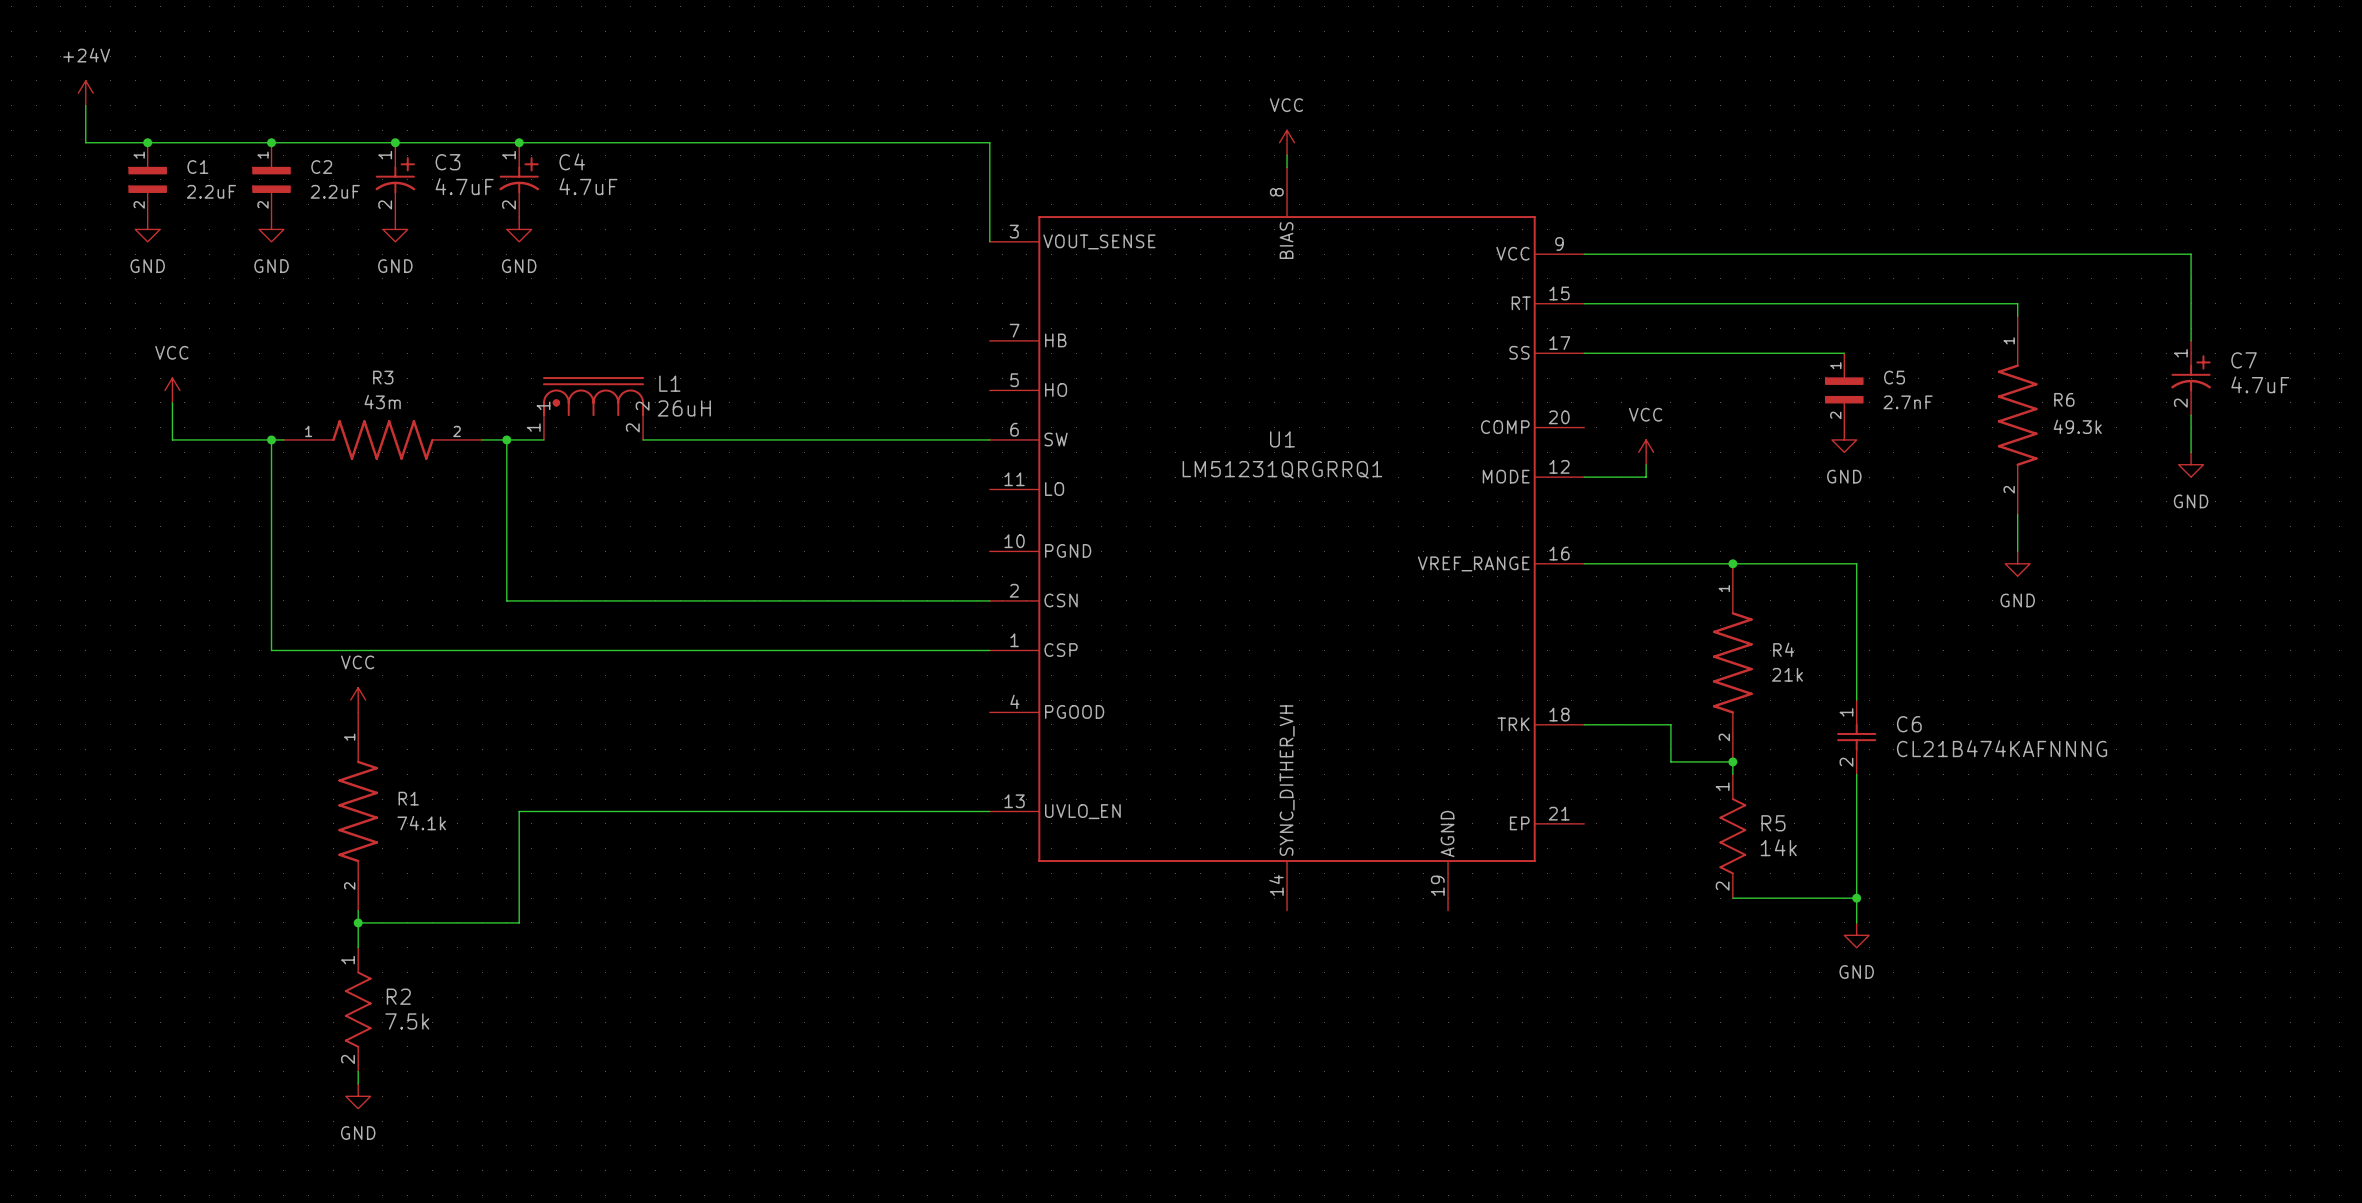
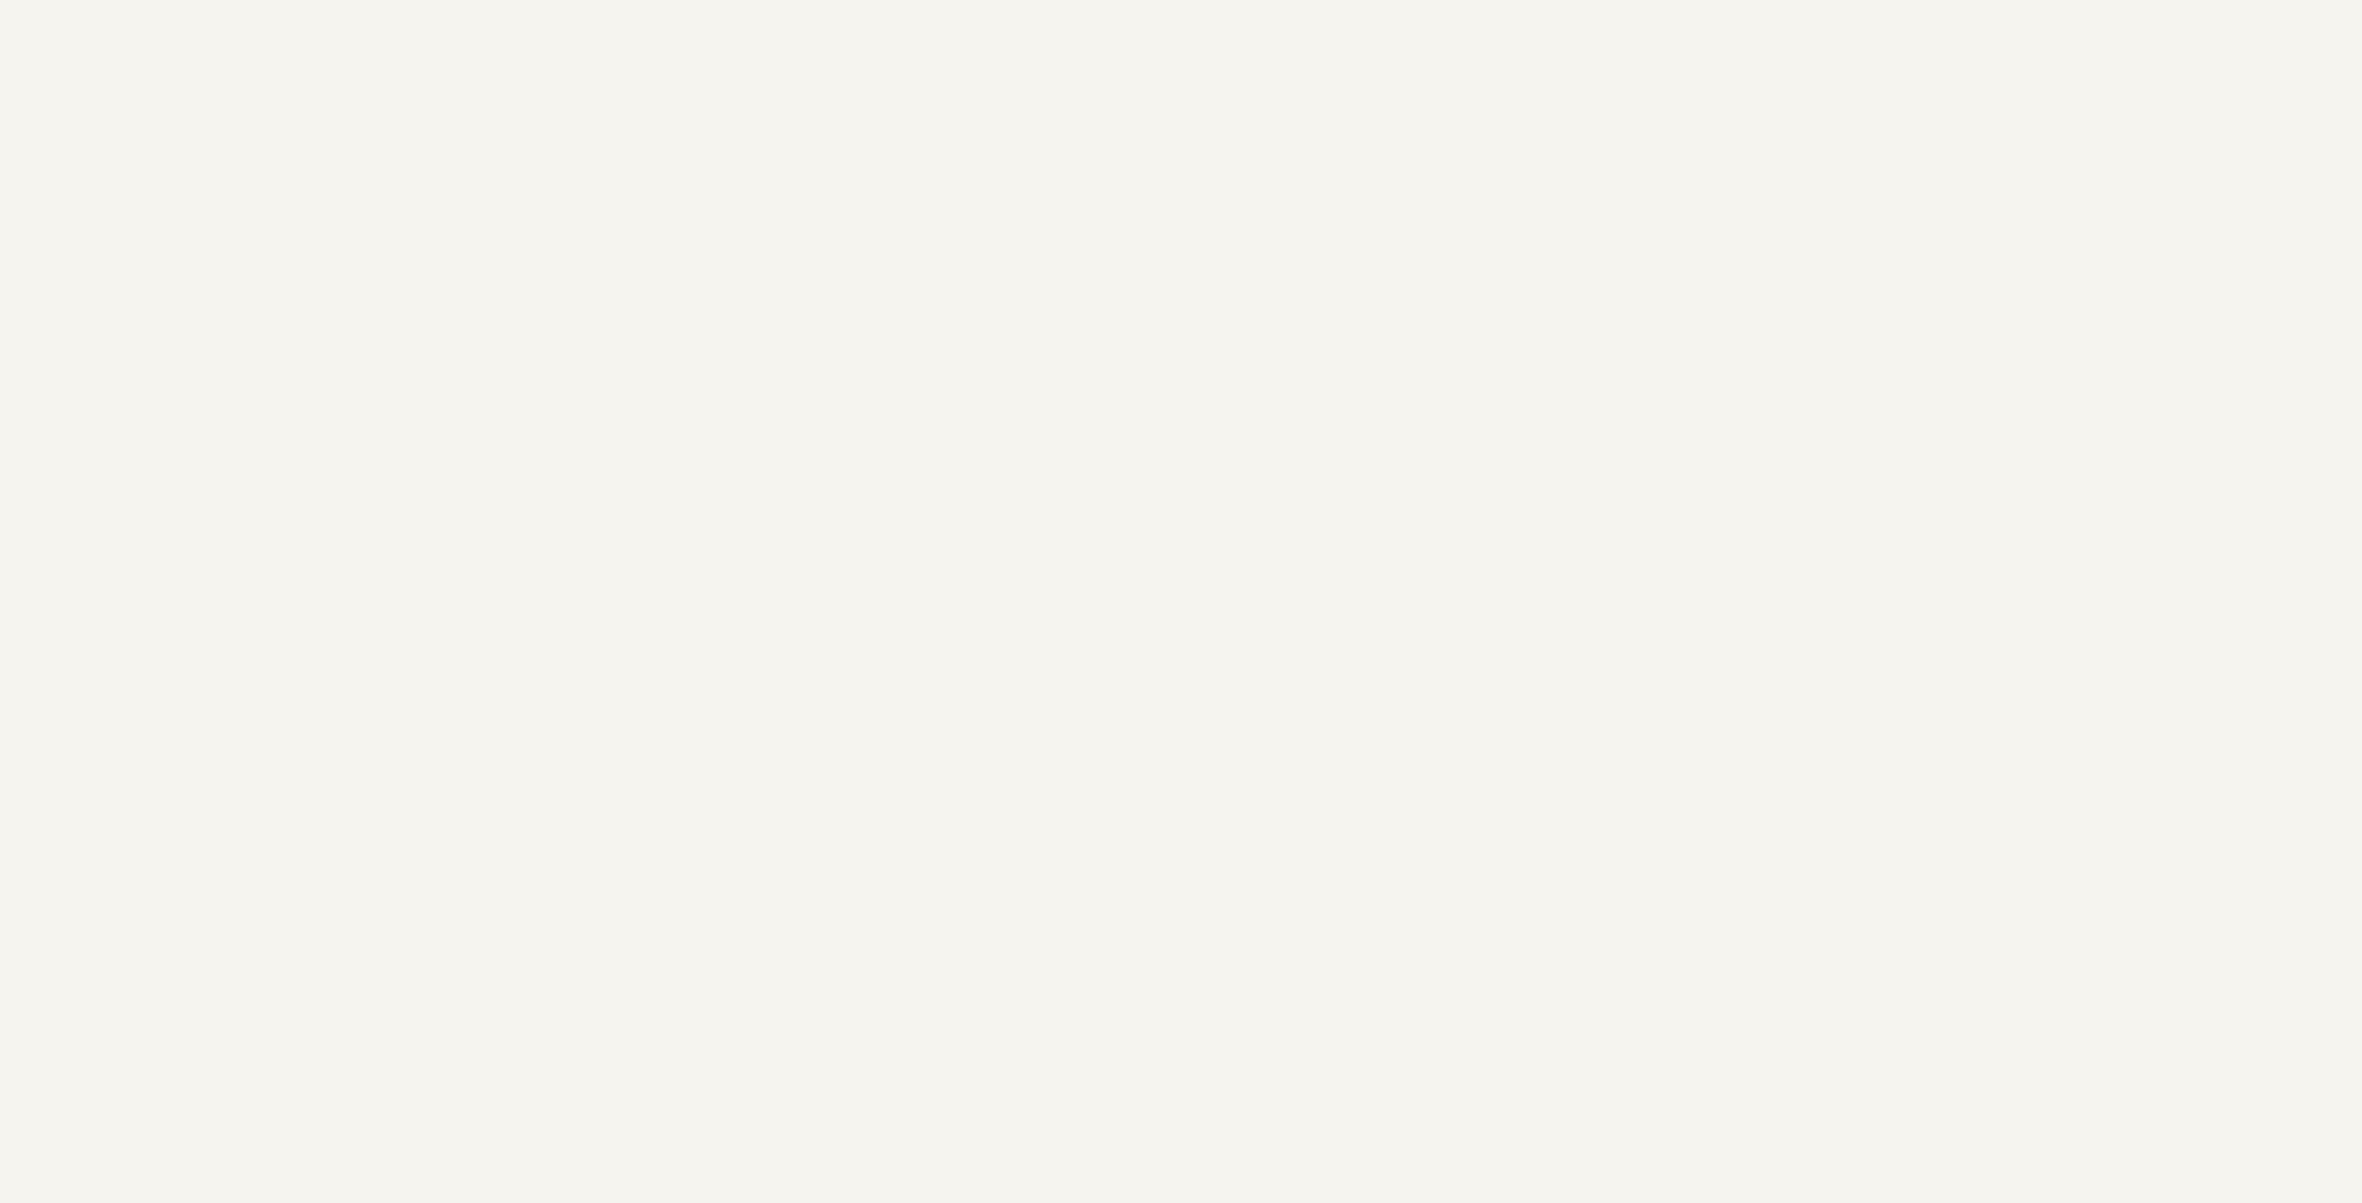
power symbol: +24V (85, 93) -> none
wire: (85, 105) (85, 142) (989, 142) (989, 241) -> none
junction: (147, 142) -> none
junction: (271, 142) -> none
junction: (395, 142) -> none
junction: (519, 142) -> none
power symbol: VCC (1287, 142) -> none
wire: (1287, 155) (1287, 167) -> none
C1: 2.2uF (147, 179) -> none
C2: 2.2uF (271, 179) -> none
C3: 4.7uF (395, 179) -> none
C4: 4.7uF (519, 179) -> none
power symbol: GND (147, 229) -> none
power symbol: GND (271, 229) -> none
power symbol: GND (395, 229) -> none
power symbol: GND (519, 229) -> none
wire: (1584, 254) (2191, 254) (2191, 340) -> none
wire: (1584, 303) (2017, 303) (2017, 316) -> none
wire: (1584, 353) (1844, 353) -> none
C7: 4.7uF (2191, 378) -> none
power symbol: VCC (172, 390) -> none
C5: 2.7nF (1844, 390) -> none
wire: (172, 402) (172, 439) (283, 439) -> none
L1: 26uH (593, 408) -> none
R6: 49.3k (2017, 415) -> none
wire: (2191, 415) (2191, 452) -> none
wire: (271, 439) (271, 650) (989, 650) -> none
junction: (271, 439) -> none
R3: 43m (382, 439) -> none
wire: (482, 439) (543, 439) -> none
wire: (506, 439) (506, 600) (989, 600) -> none
junction: (506, 439) -> none
wire: (643, 439) (989, 439) -> none
power symbol: GND (1844, 439) -> none
power symbol: VCC (1646, 452) -> none
wire: (1646, 464) (1646, 477) (1584, 477) -> none
power symbol: GND (2191, 464) -> none
wire: (2017, 514) (2017, 551) -> none
U1: LM51231QRGRRQ1 (1287, 539) -> none
wire: (1584, 563) (1856, 563) (1856, 700) -> none
junction: (1732, 563) -> none
power symbol: GND (2017, 563) -> none
R4: 21k (1732, 662) -> none
power symbol: VCC (358, 700) -> none
wire: (1584, 724) (1670, 724) (1670, 761) (1732, 761) (1732, 774) -> none
C6: CL21B474KAFNNNG (1856, 737) -> none
junction: (1732, 761) -> none
wire: (1856, 774) (1856, 922) -> none
R1: 74.1k (358, 811) -> none
wire: (989, 811) (519, 811) (519, 922) (358, 922) -> none
R5: 14k (1732, 836) -> none
wire: (1732, 898) (1856, 898) -> none
junction: (1856, 898) -> none
wire: (358, 910) (358, 947) -> none
junction: (358, 922) -> none
power symbol: GND (1856, 935) -> none
R2: 7.5k (358, 1009) -> none
wire: (358, 1071) (358, 1083) -> none
power symbol: GND (358, 1096) -> none

